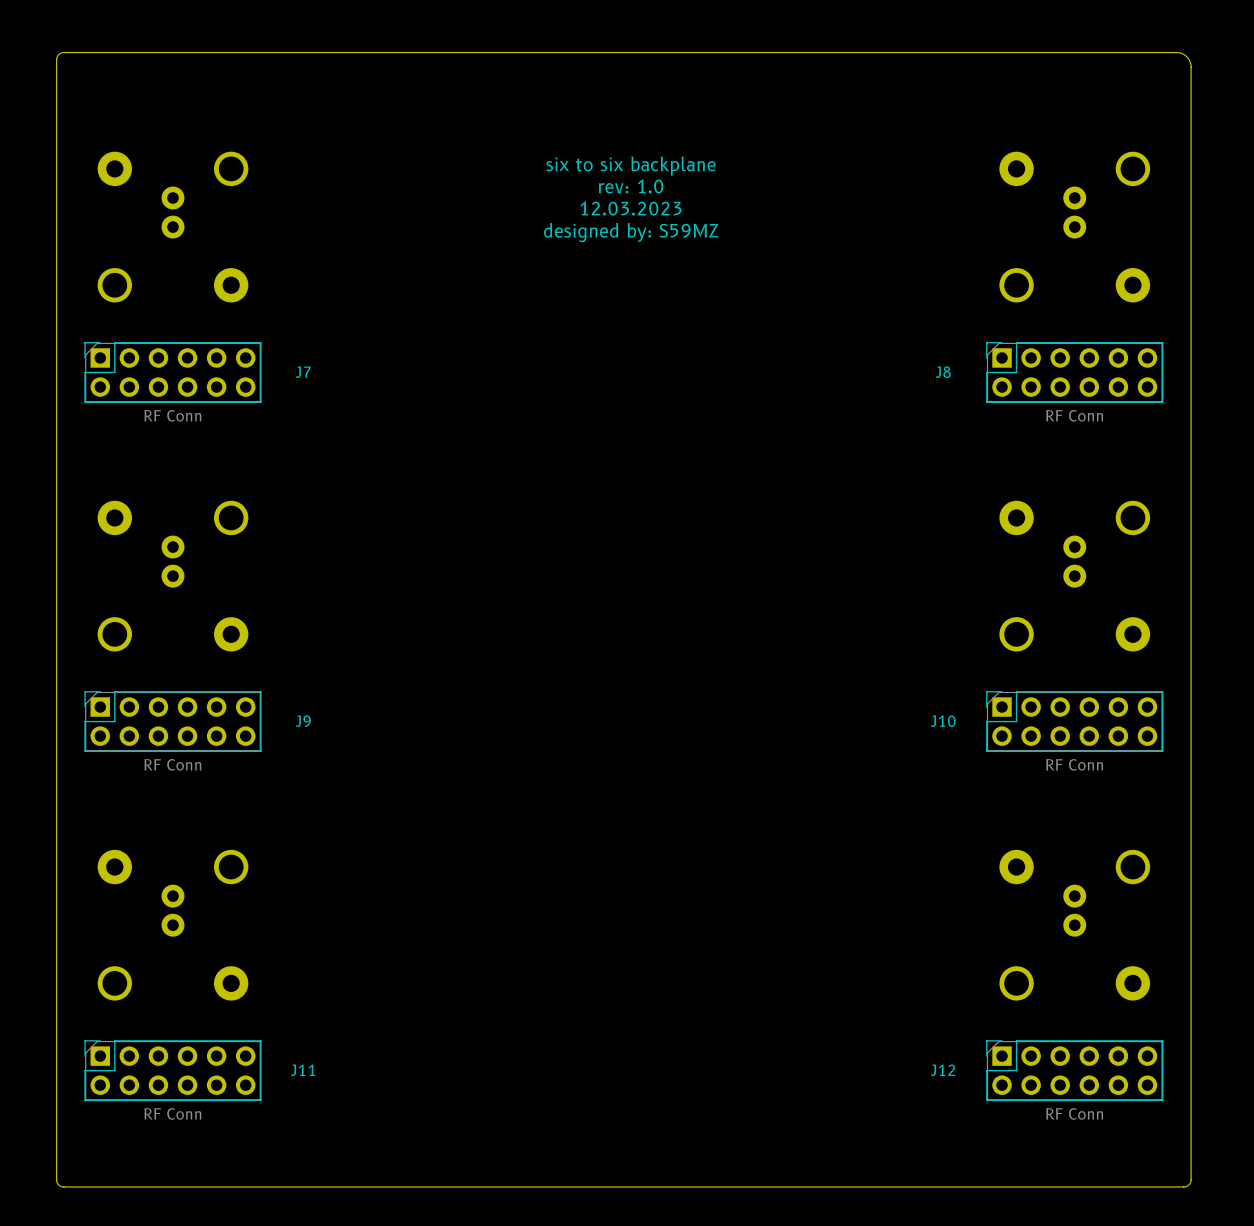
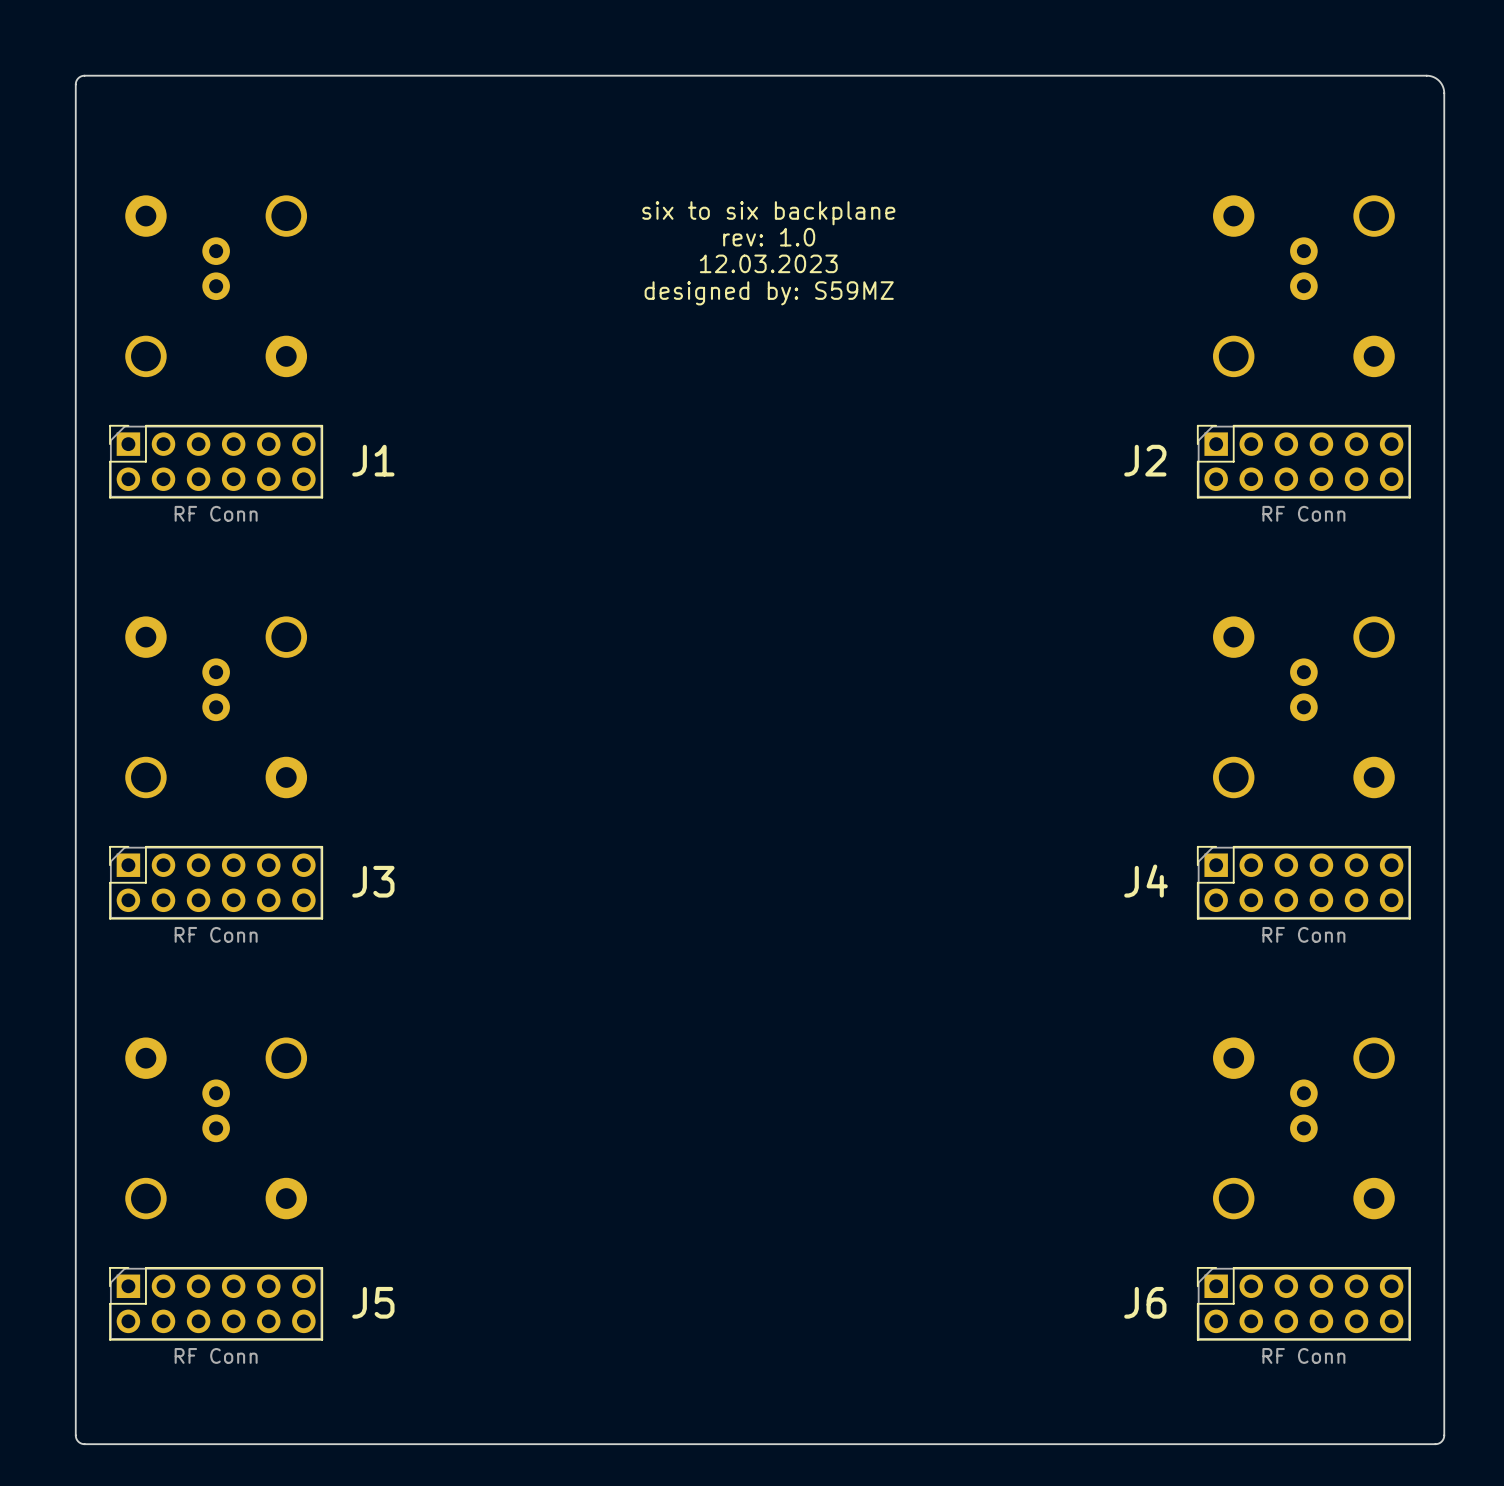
J7 name: J7 (303, 372) -> J1 (373, 460)
J8 name: J8 (943, 372) -> J2 (1145, 460)
J9 name: J9 (303, 721) -> J3 (373, 881)
J10 name: J10 (943, 721) -> J4 (1146, 881)
J11 name: J11 (302, 1070) -> J5 (373, 1302)
J12 name: J12 (942, 1070) -> J6 (1145, 1302)

